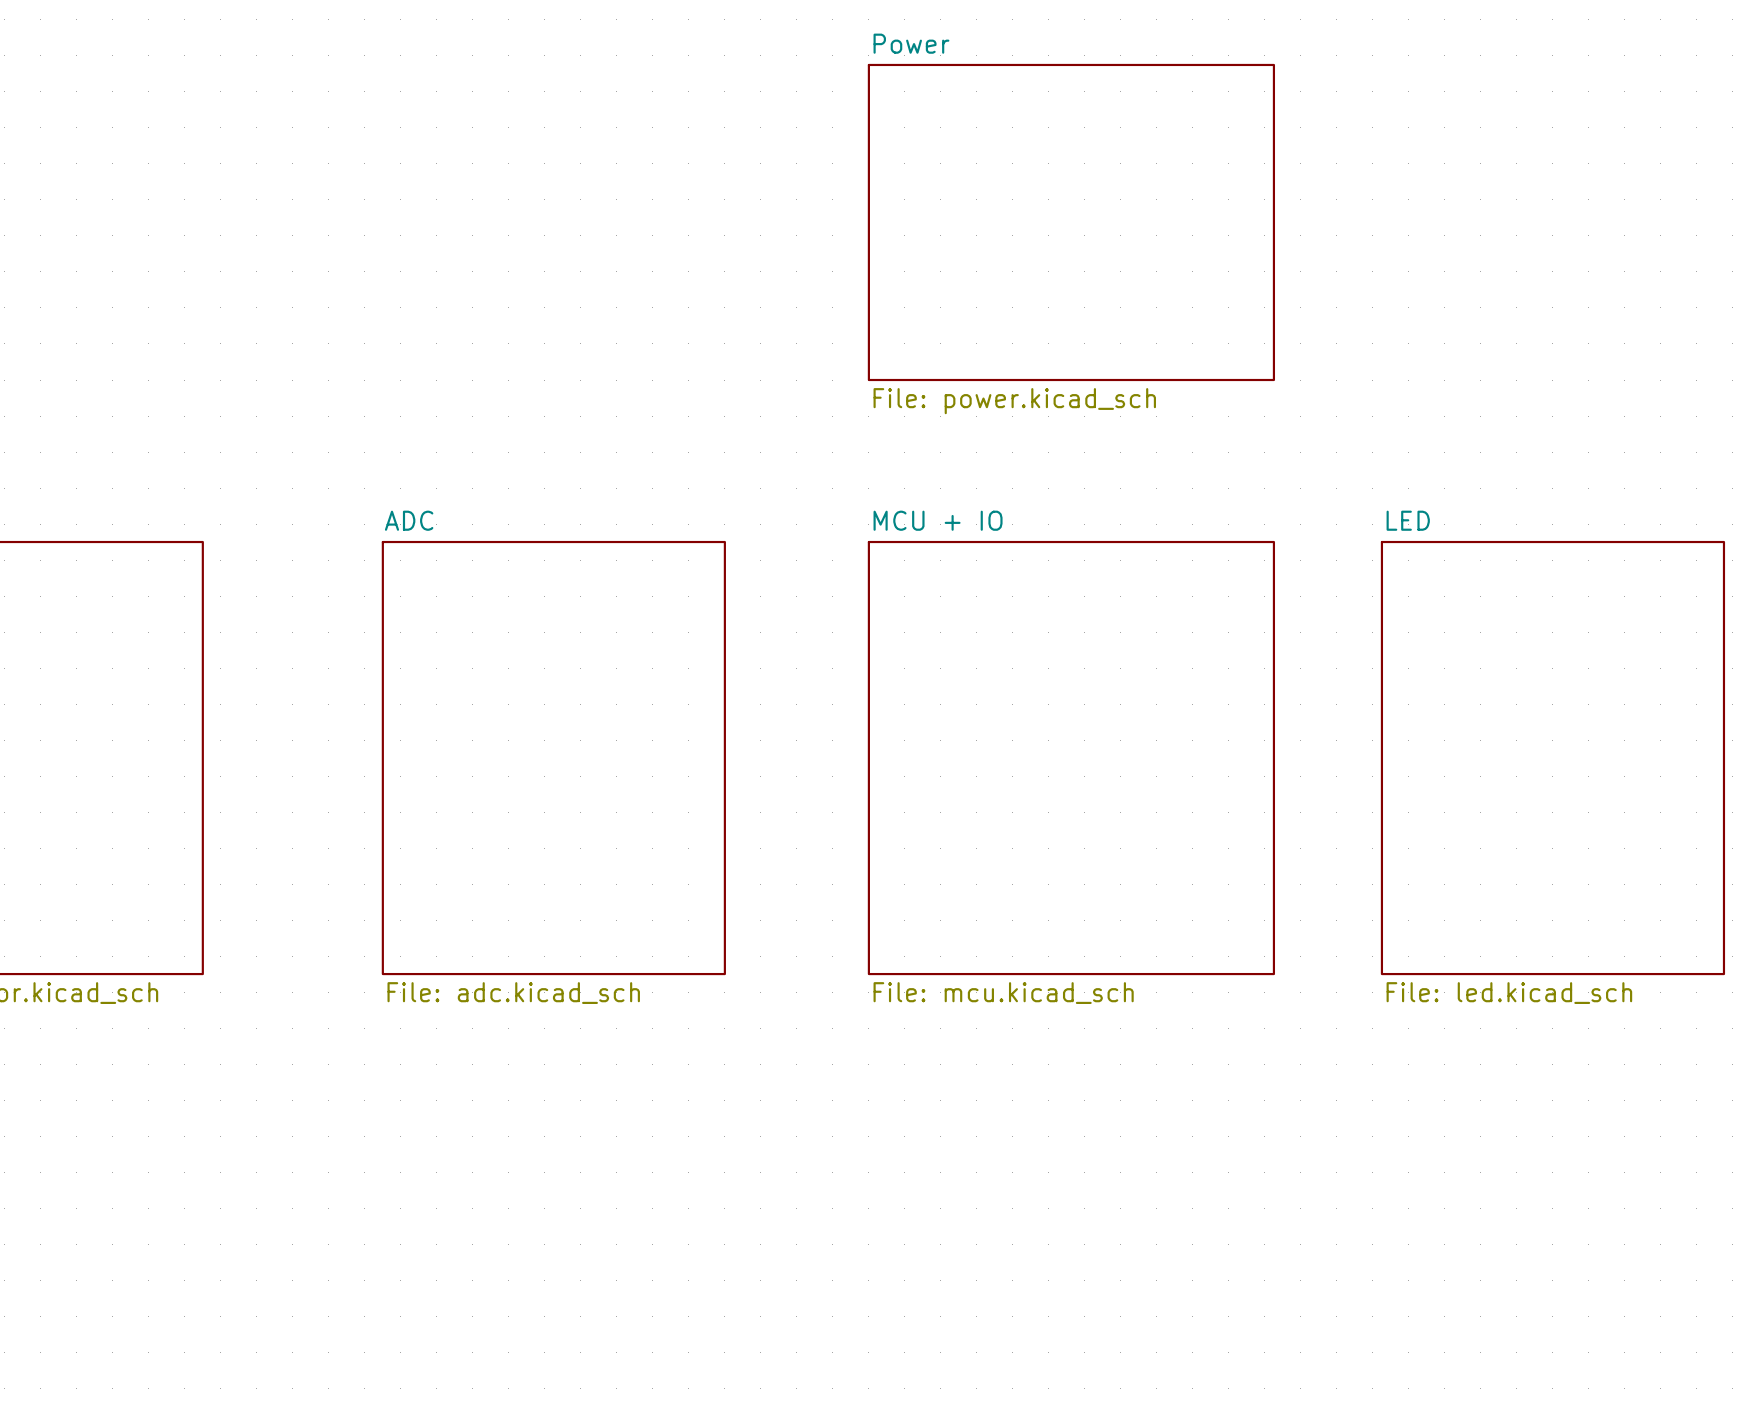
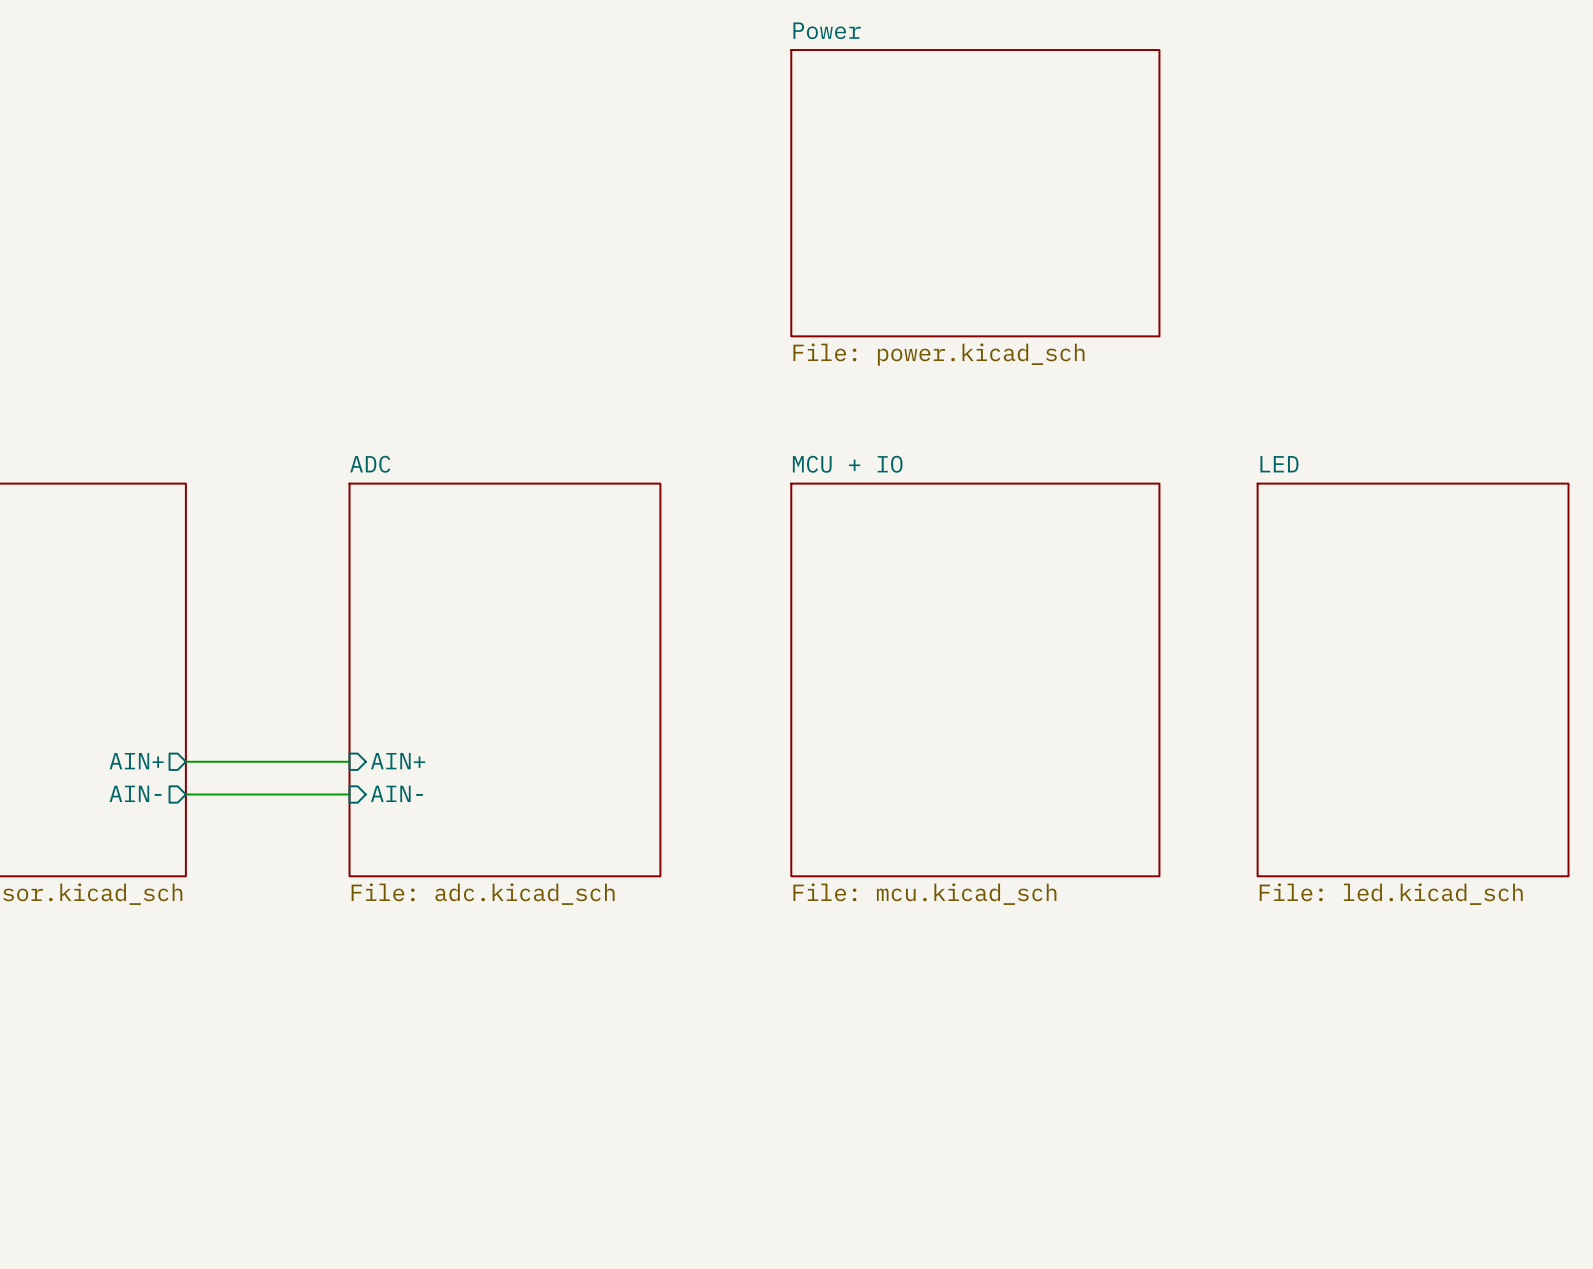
sheet pin: none -> AIN+ (136, 761)
sheet pin: none -> AIN+ (398, 761)
wire: none -> (185, 761) (349, 761)
sheet pin: none -> AIN- (135, 793)
sheet pin: none -> AIN- (396, 793)
wire: none -> (185, 794) (349, 794)

